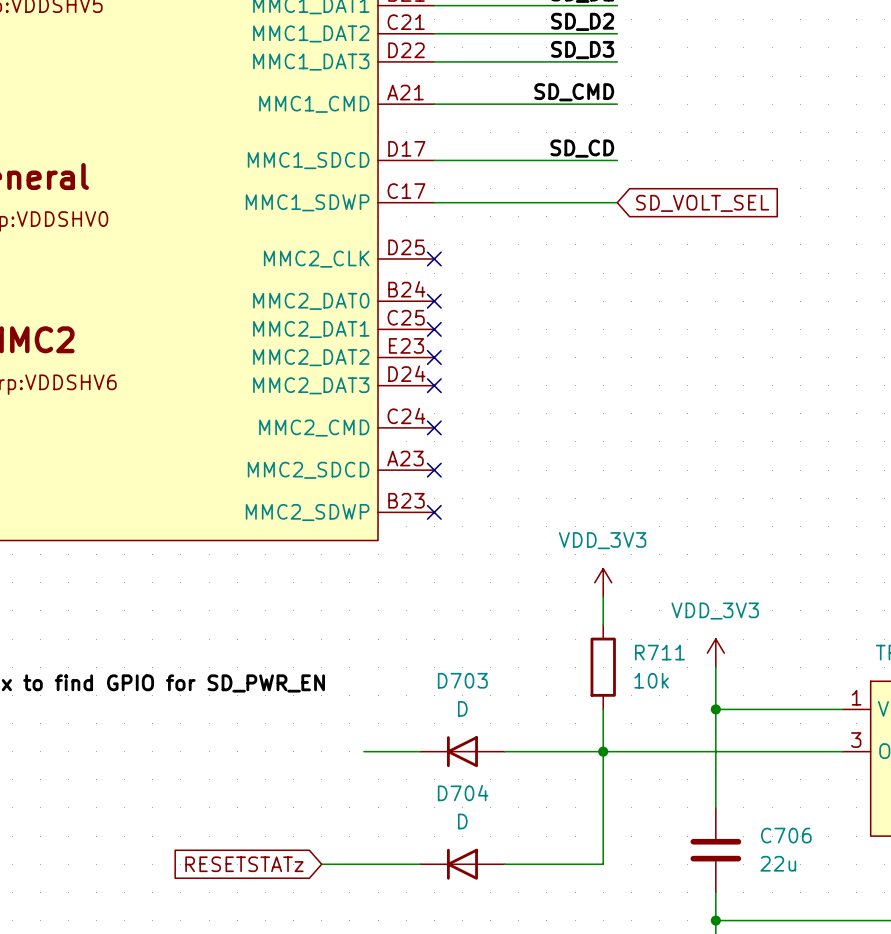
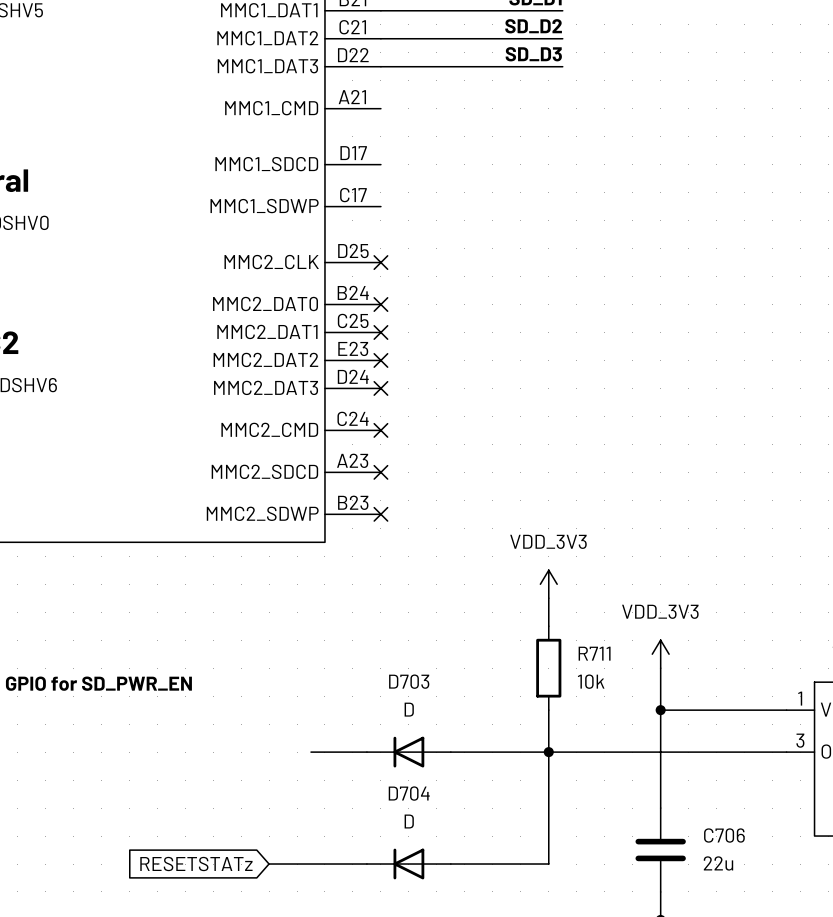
label: SD_CMD (574, 92) -> none
wire: (434, 104) (617, 104) -> none
label: SD_CD (582, 148) -> none
wire: (434, 160) (617, 160) -> none
wire: (434, 202) (617, 202) -> none
global label: SD_VOLT_SEL (702, 203) -> none

